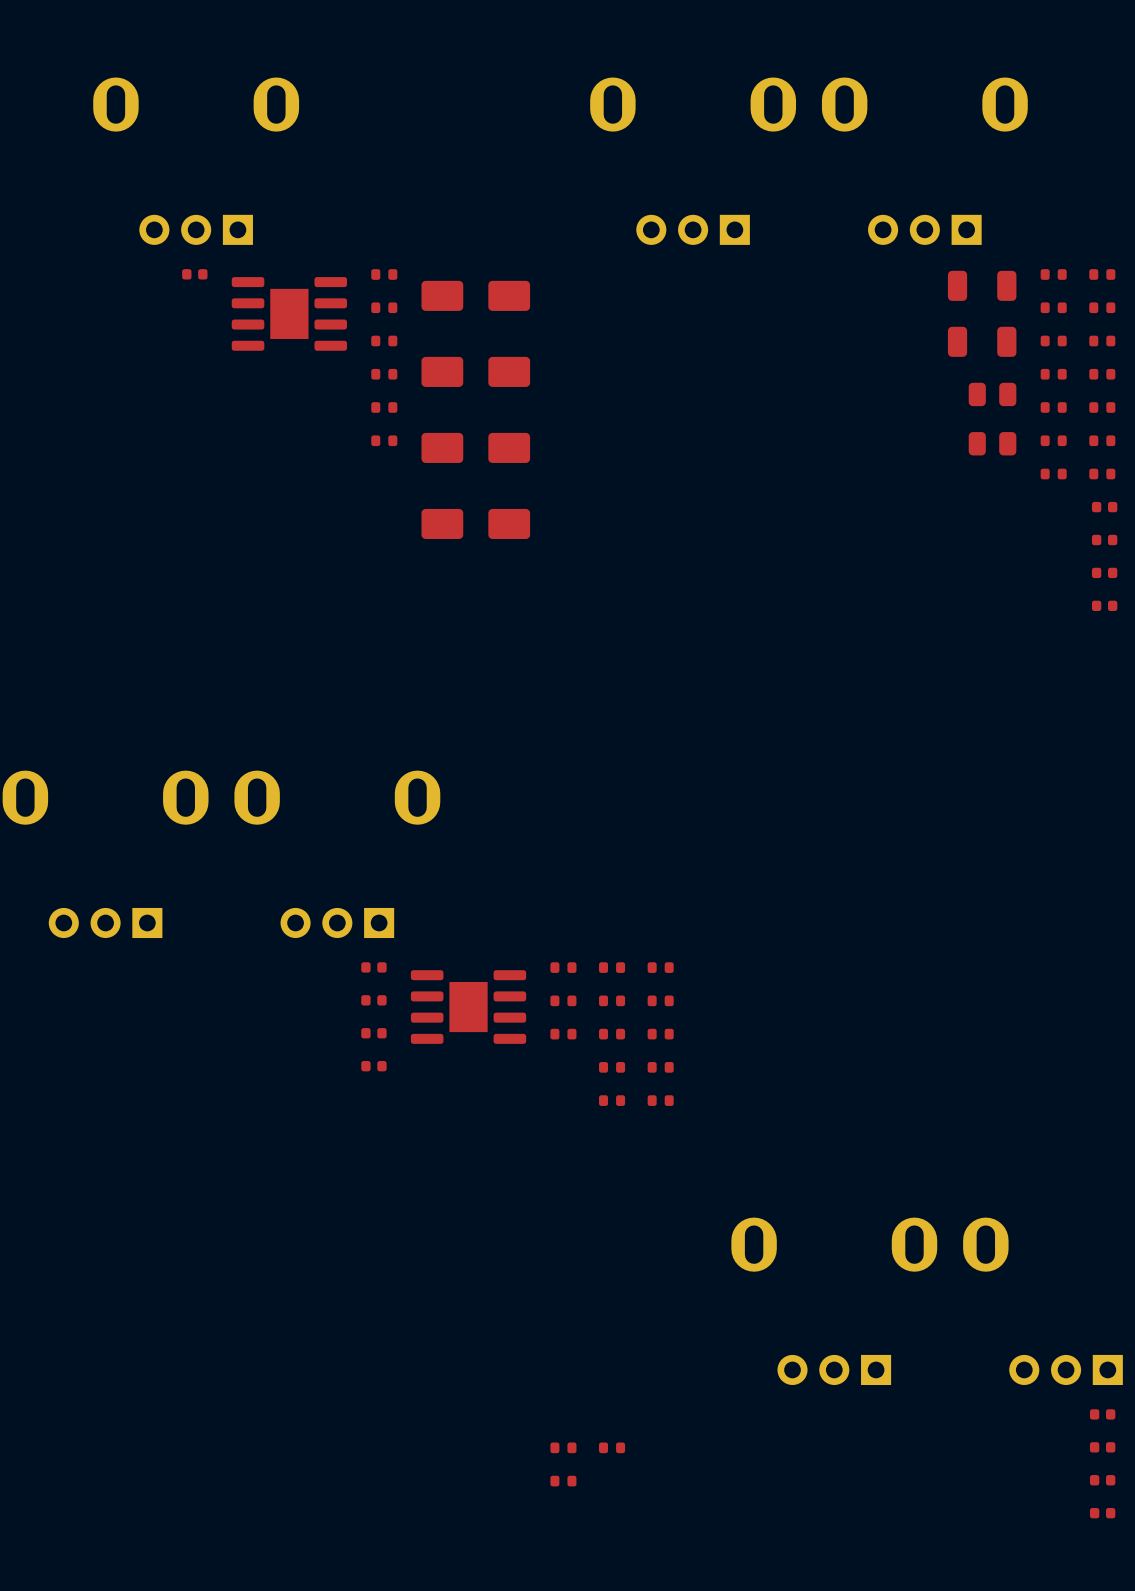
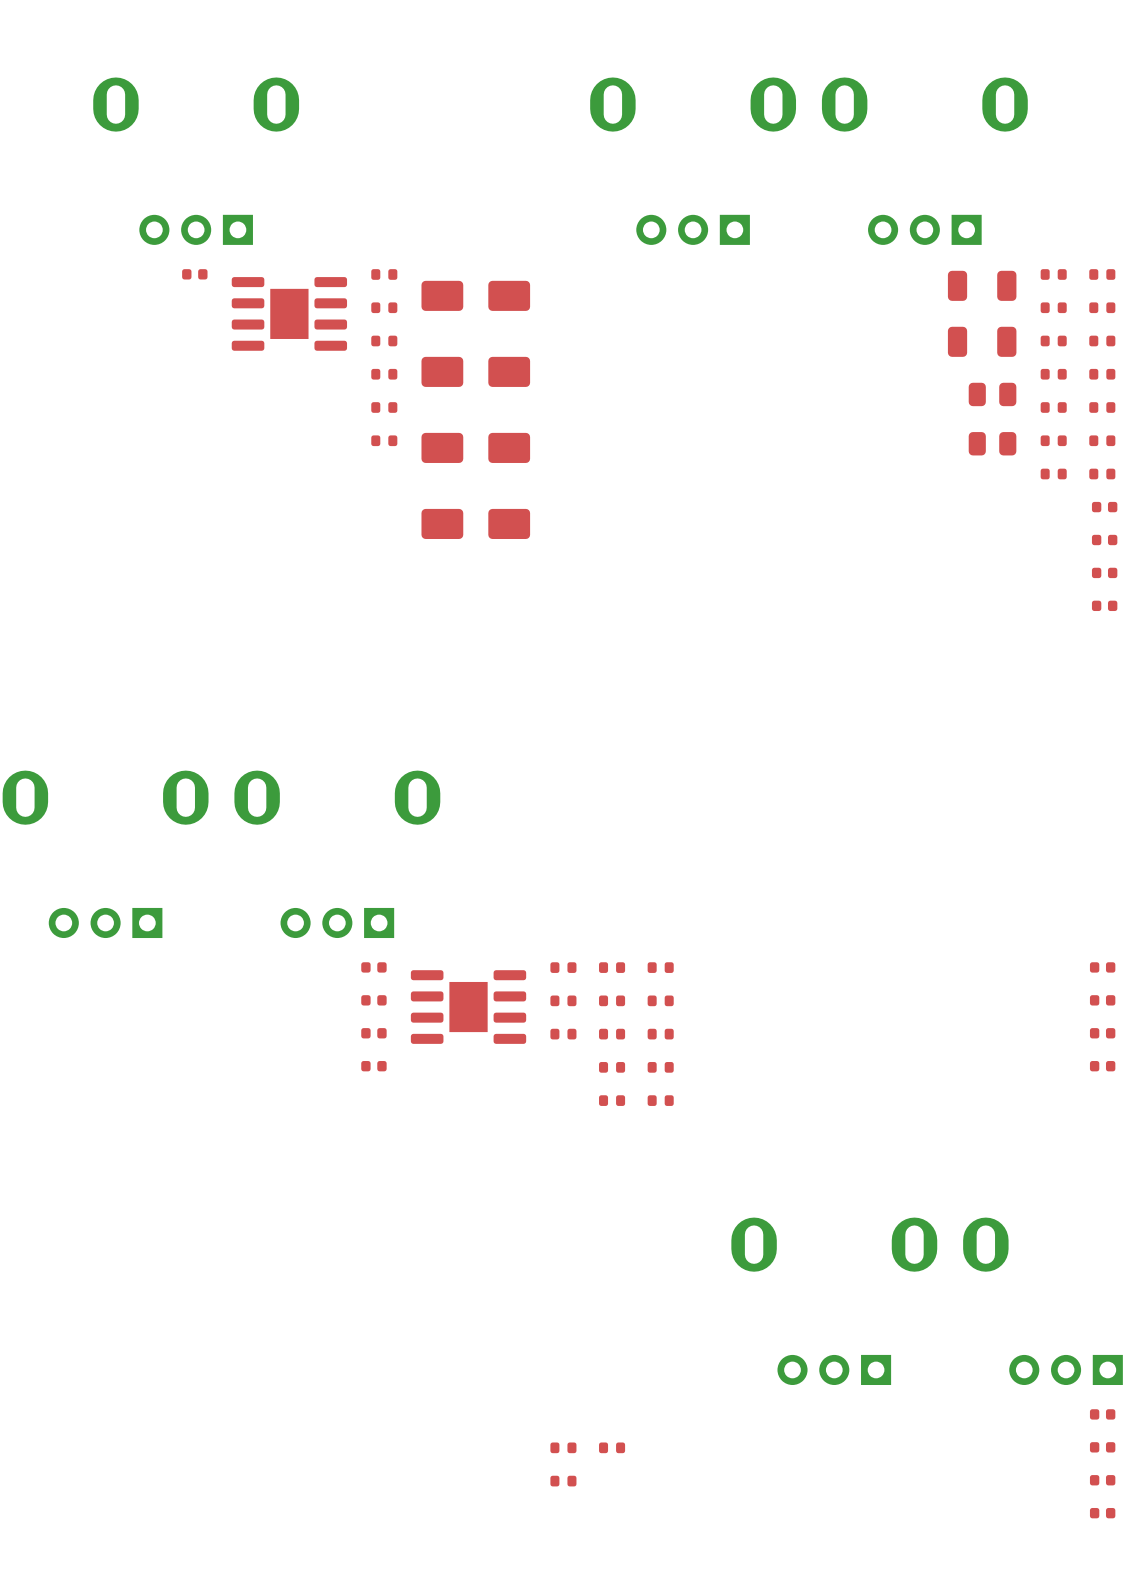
part: none -> (1102, 967)
part: none -> (1102, 1000)
part: none -> (1102, 1033)
part: none -> (1102, 1066)

